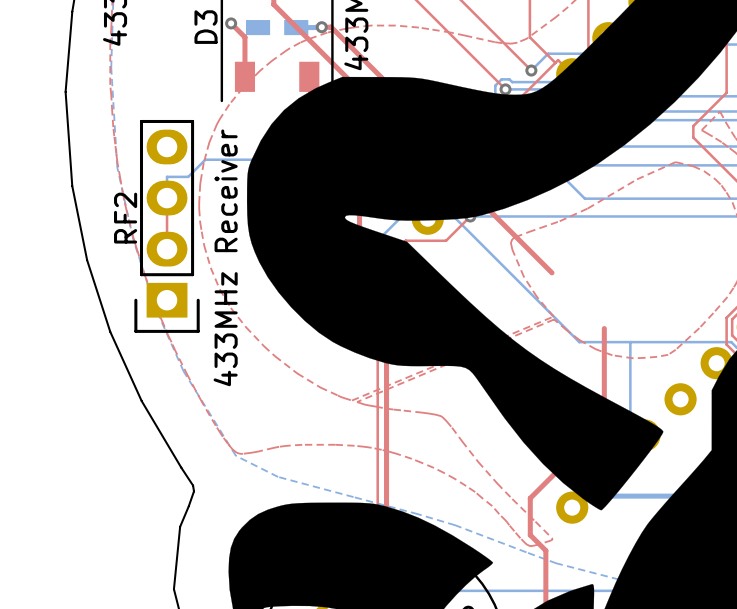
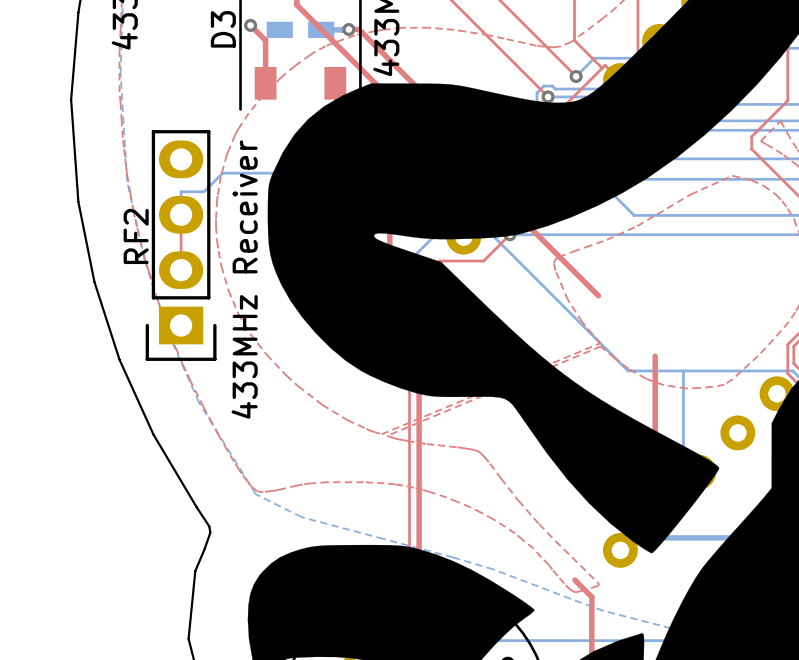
top track: (608, 471) (592, 455) (573, 455) (530, 498) (530, 535) -> none

